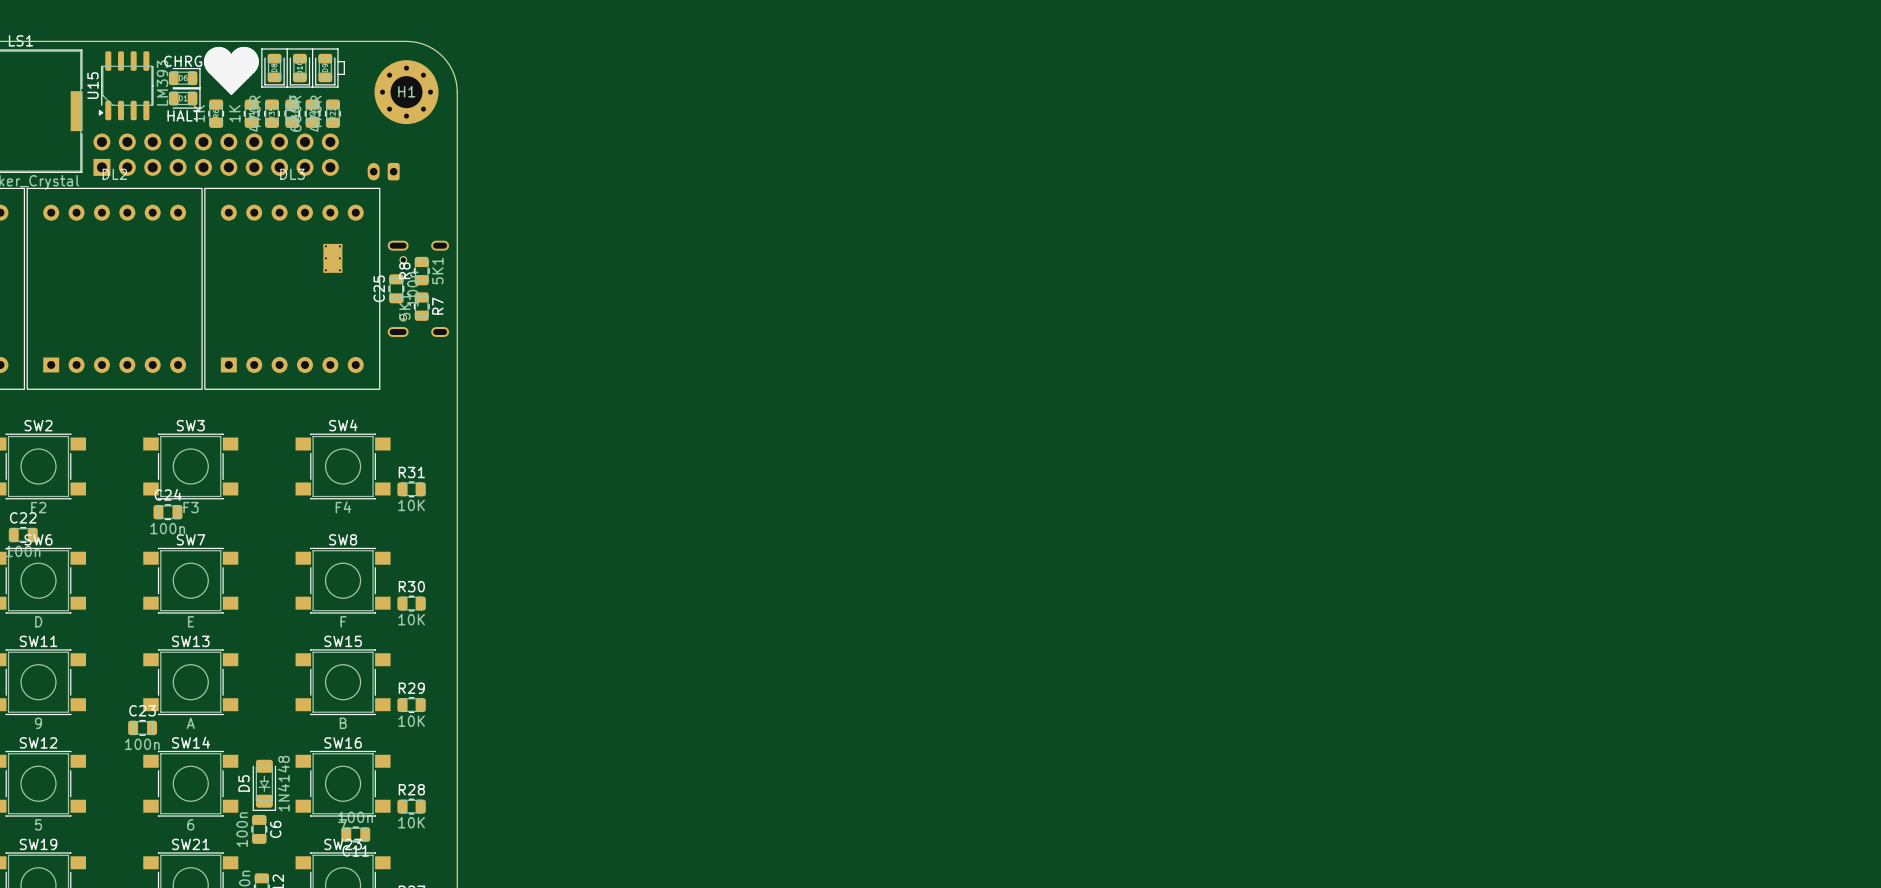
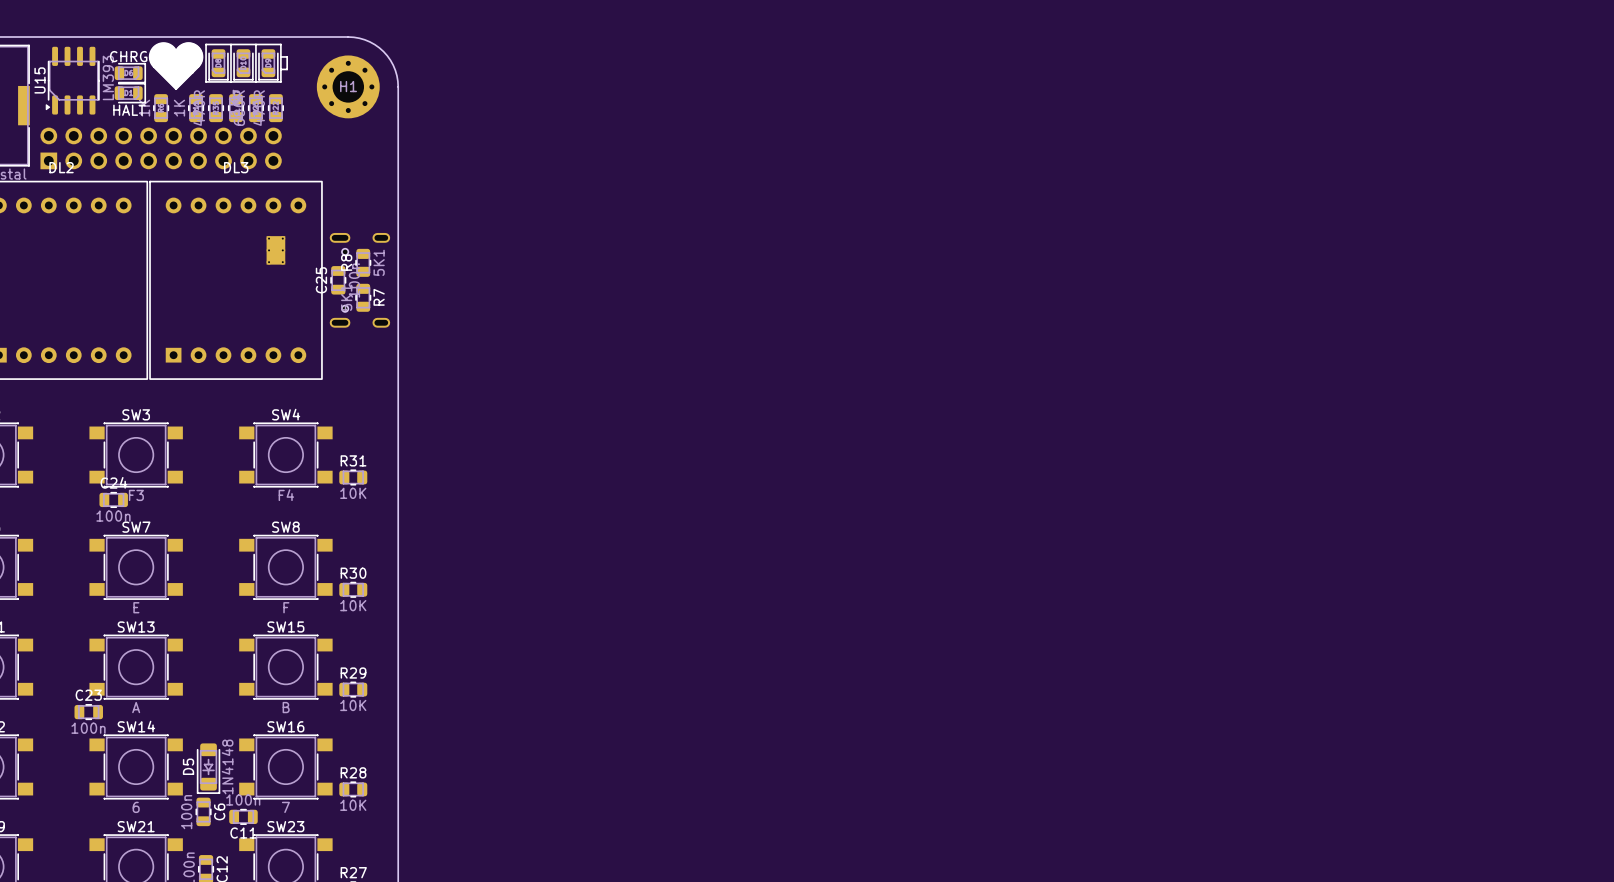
part: (383, 171) -> none
C11 position: (355, 834) -> (243, 816)

